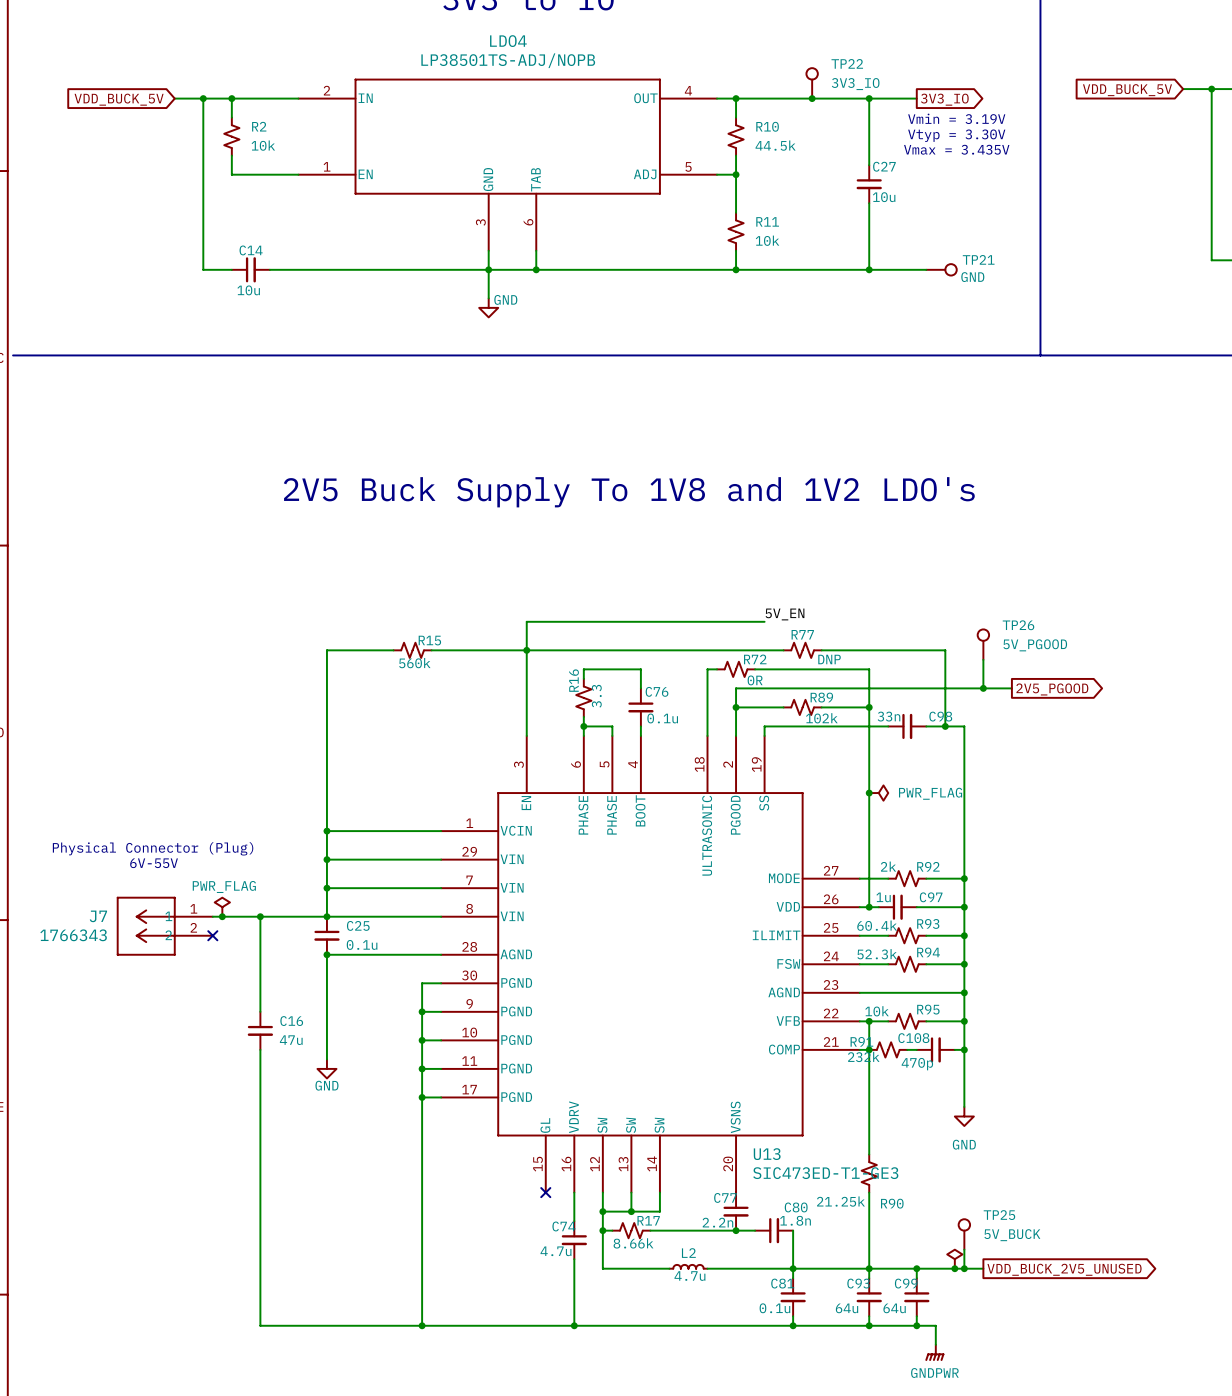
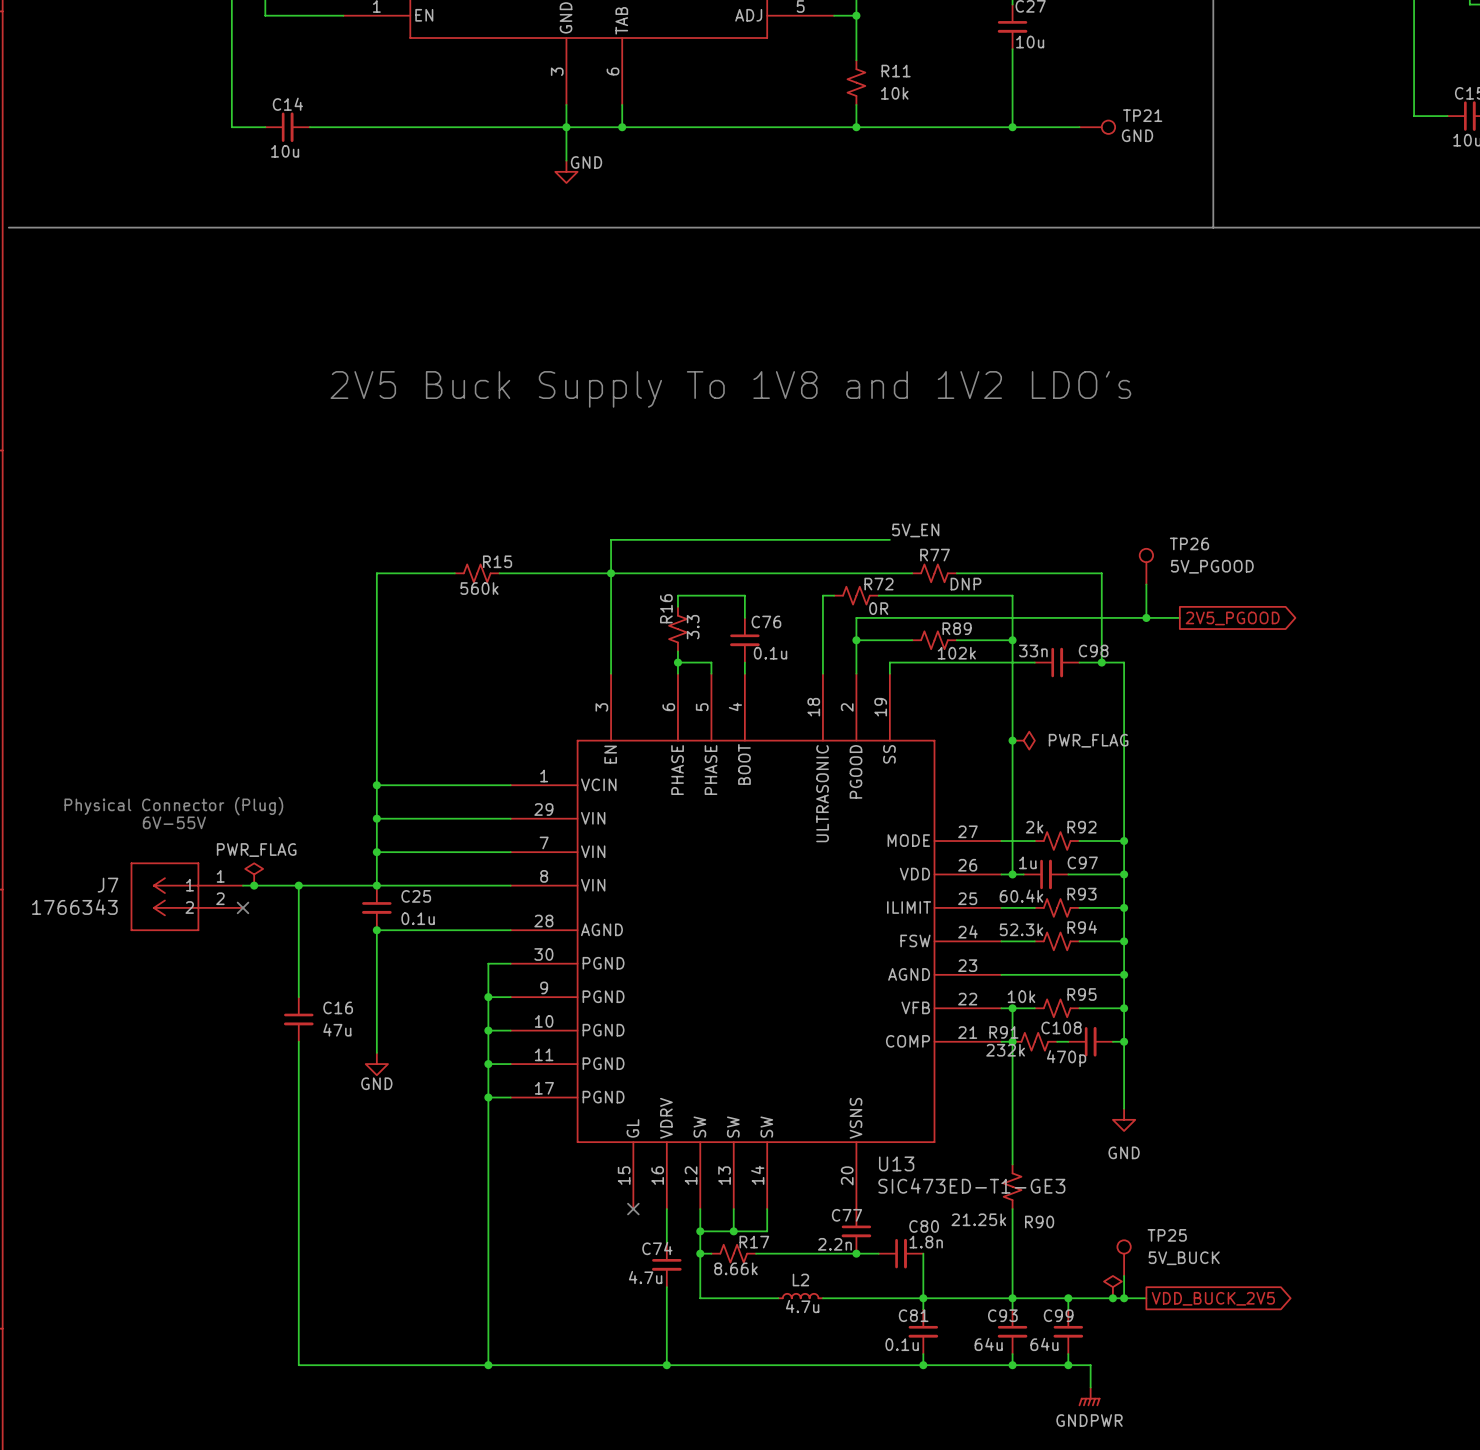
global label: VDD_BUCK_2V5_UNUSED (1064, 1269) -> VDD_BUCK_2V5 (1213, 1298)

